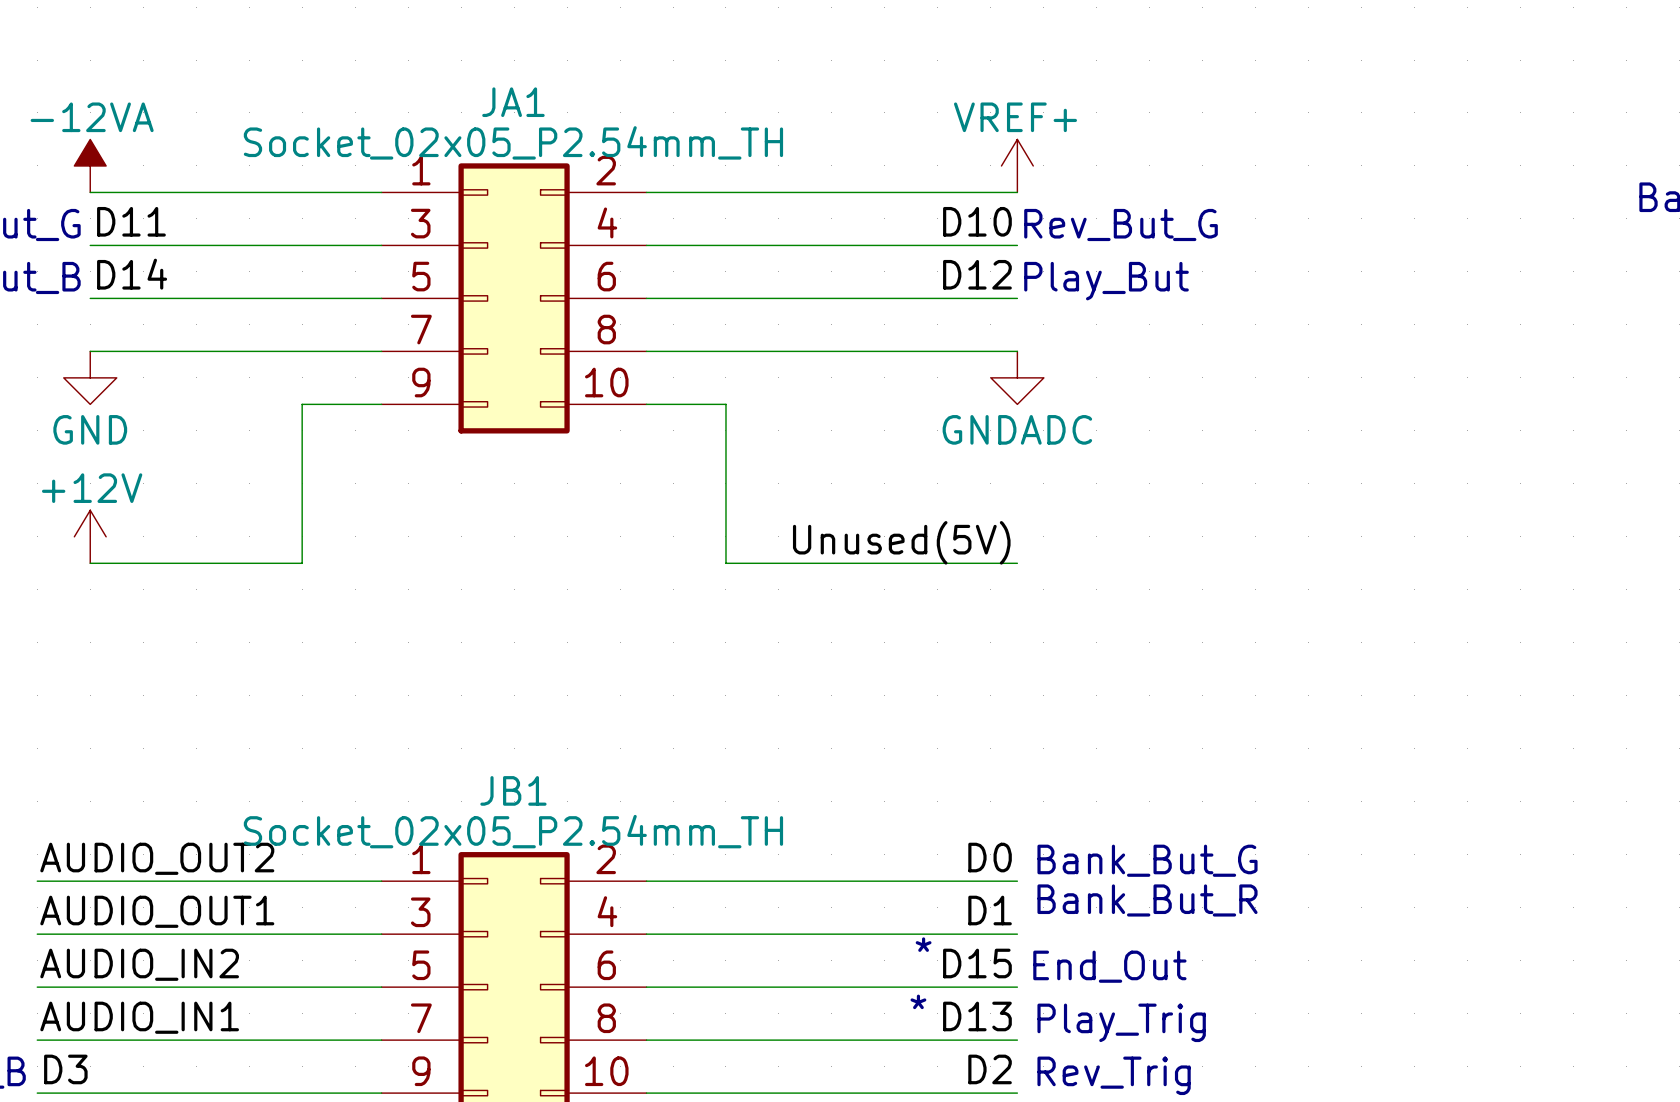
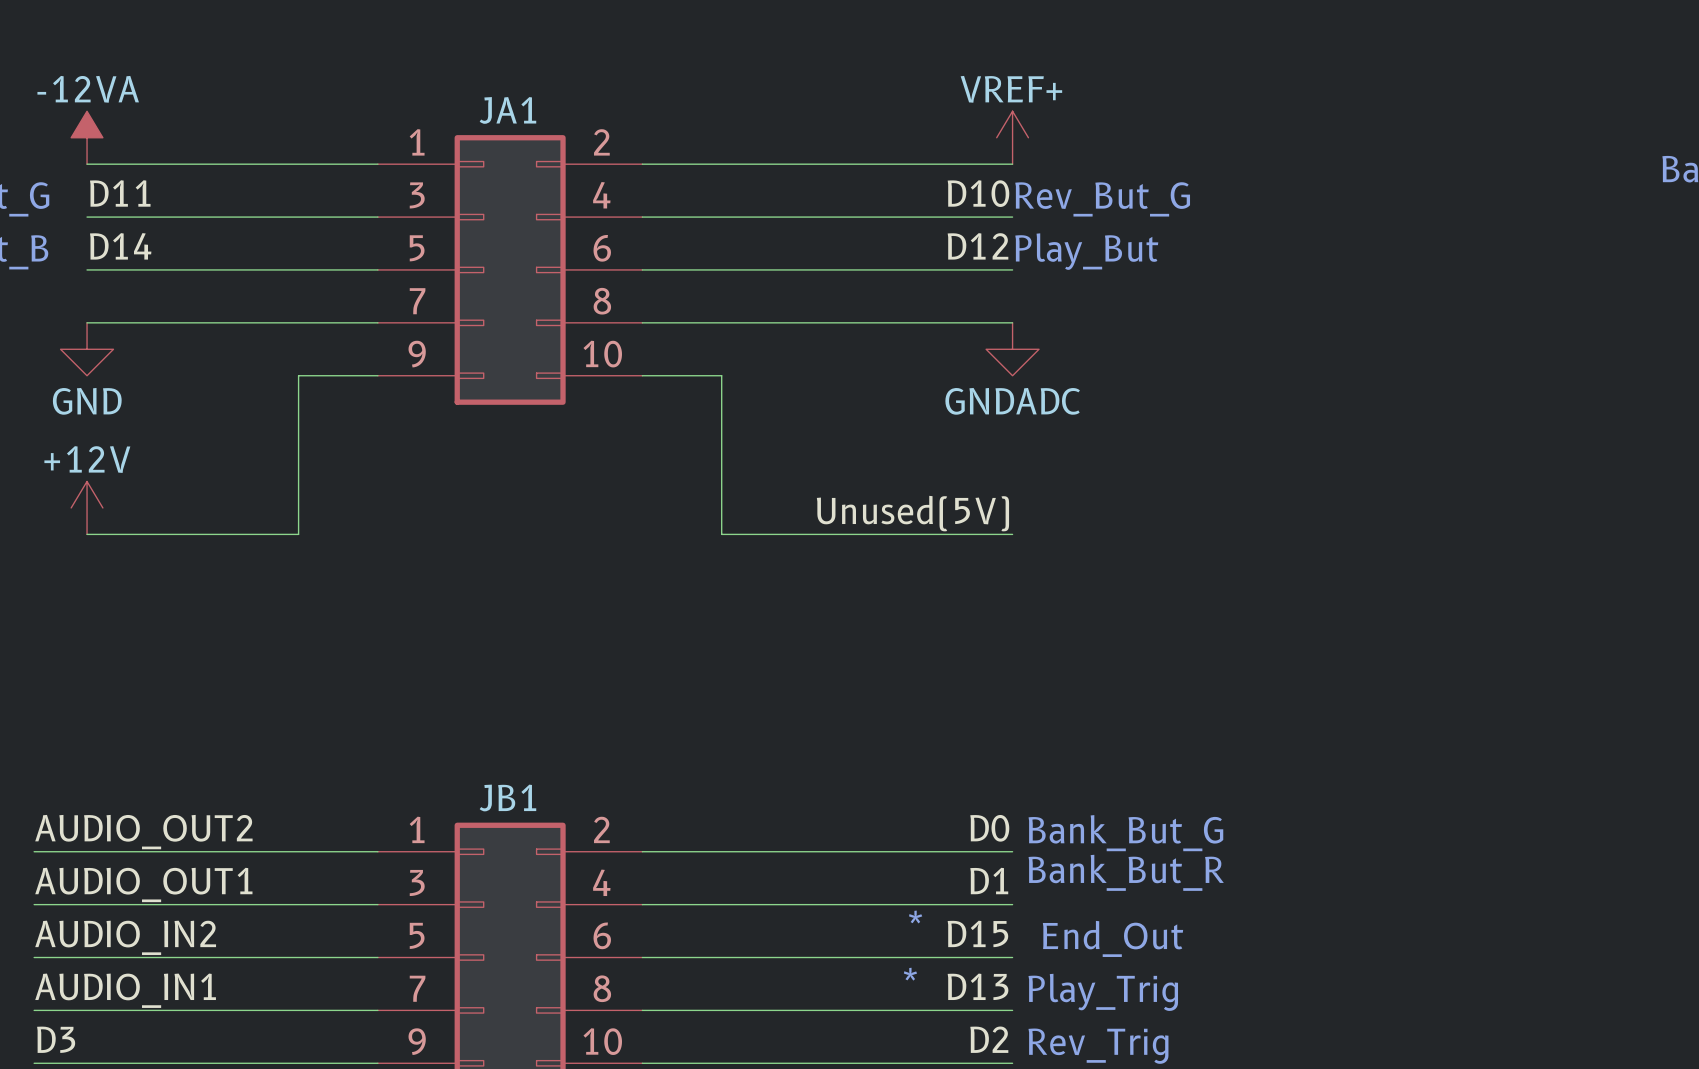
JA1 name position: JA1 (513, 102) -> JA1 (507, 110)
JA1 value: Socket_02x05_P2.54mm_TH (513, 142) -> none
JB1 name position: JB1 (513, 790) -> JB1 (507, 798)
JB1 value: Socket_02x05_P2.54mm_TH (513, 831) -> none

